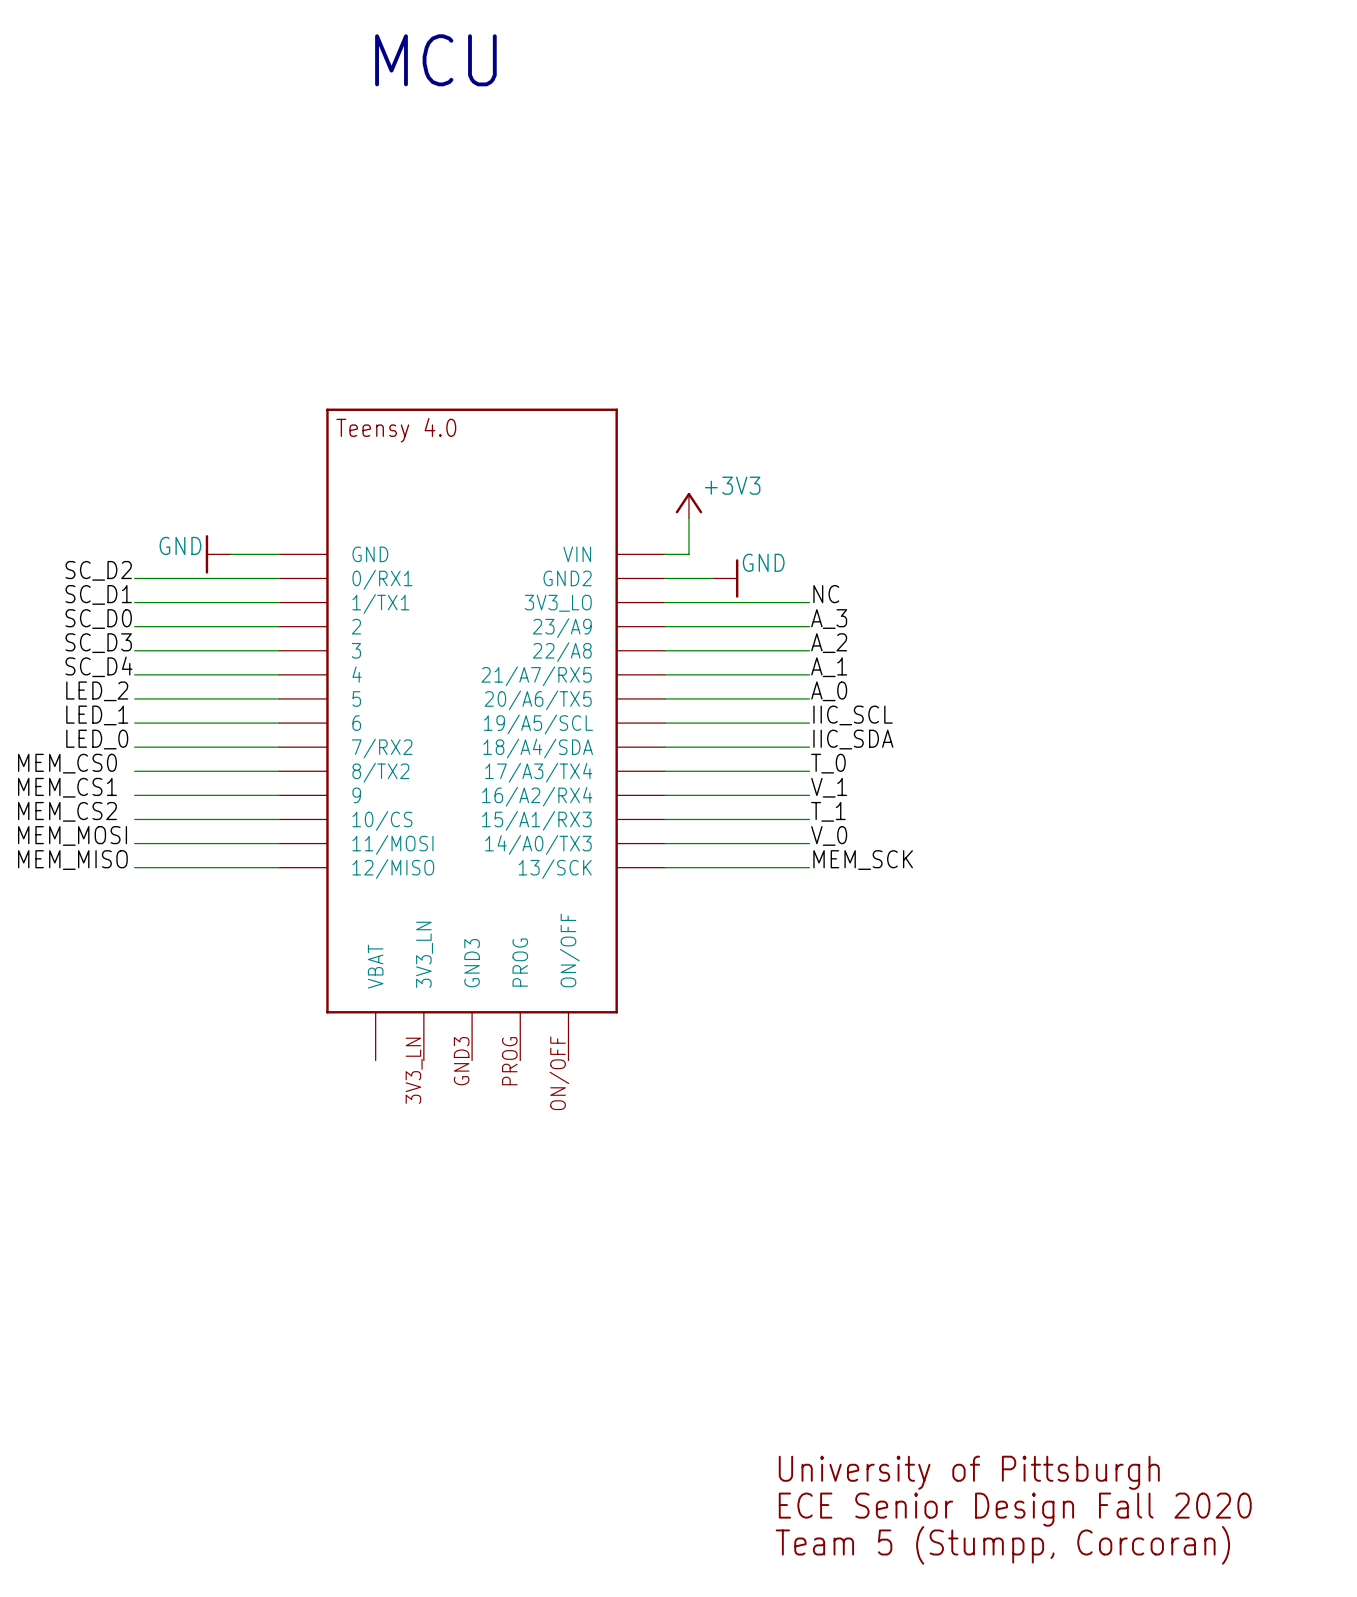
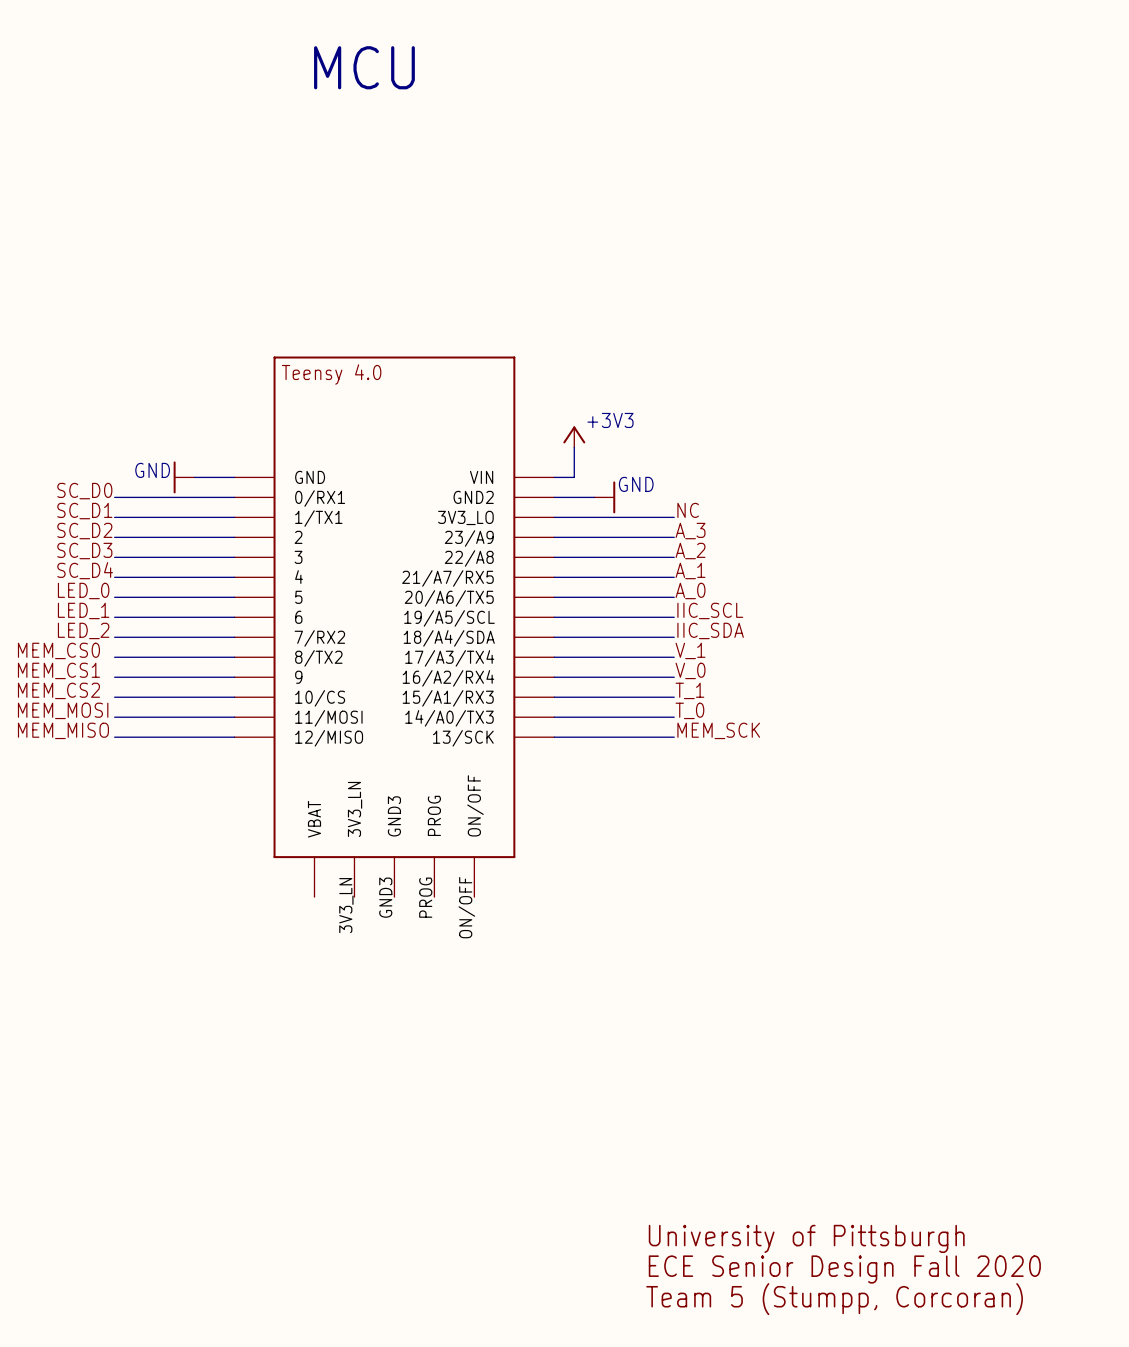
label: SC_D2 (98, 570) -> SC_D0 (84, 491)
label: SC_D0 (98, 619) -> SC_D2 (84, 531)
label: LED_2 (97, 691) -> LED_0 (83, 590)
label: LED_0 (97, 739) -> LED_2 (83, 630)
label: T_0 (828, 763) -> V_1 (690, 650)
label: V_1 (829, 787) -> V_0 (690, 670)
label: V_0 (829, 835) -> T_0 (689, 710)

